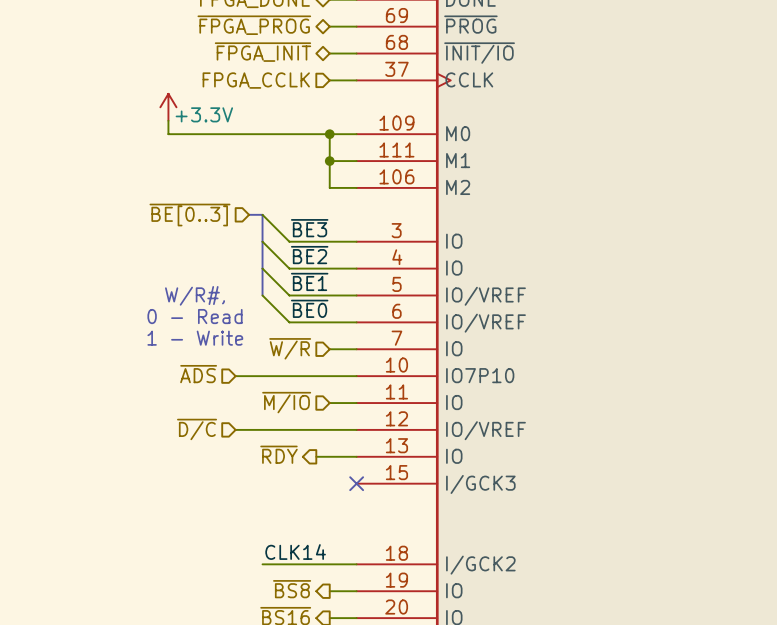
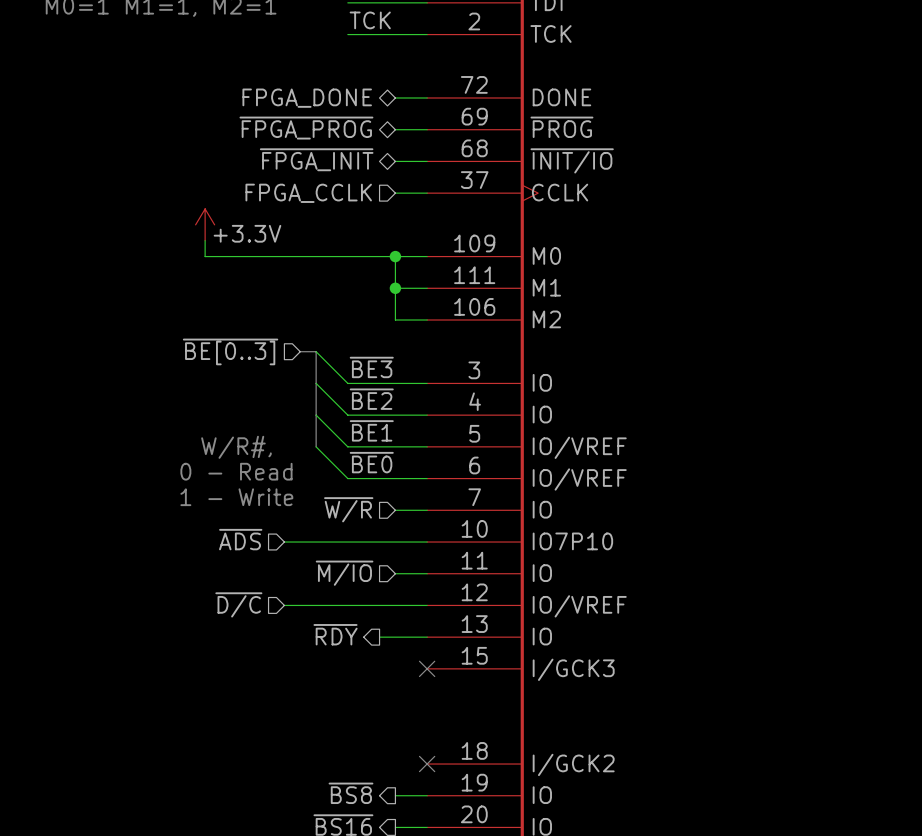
label: CLK14 (295, 552) -> none
wire: (262, 564) (356, 564) -> none
no-connect mark: none -> (427, 764)

